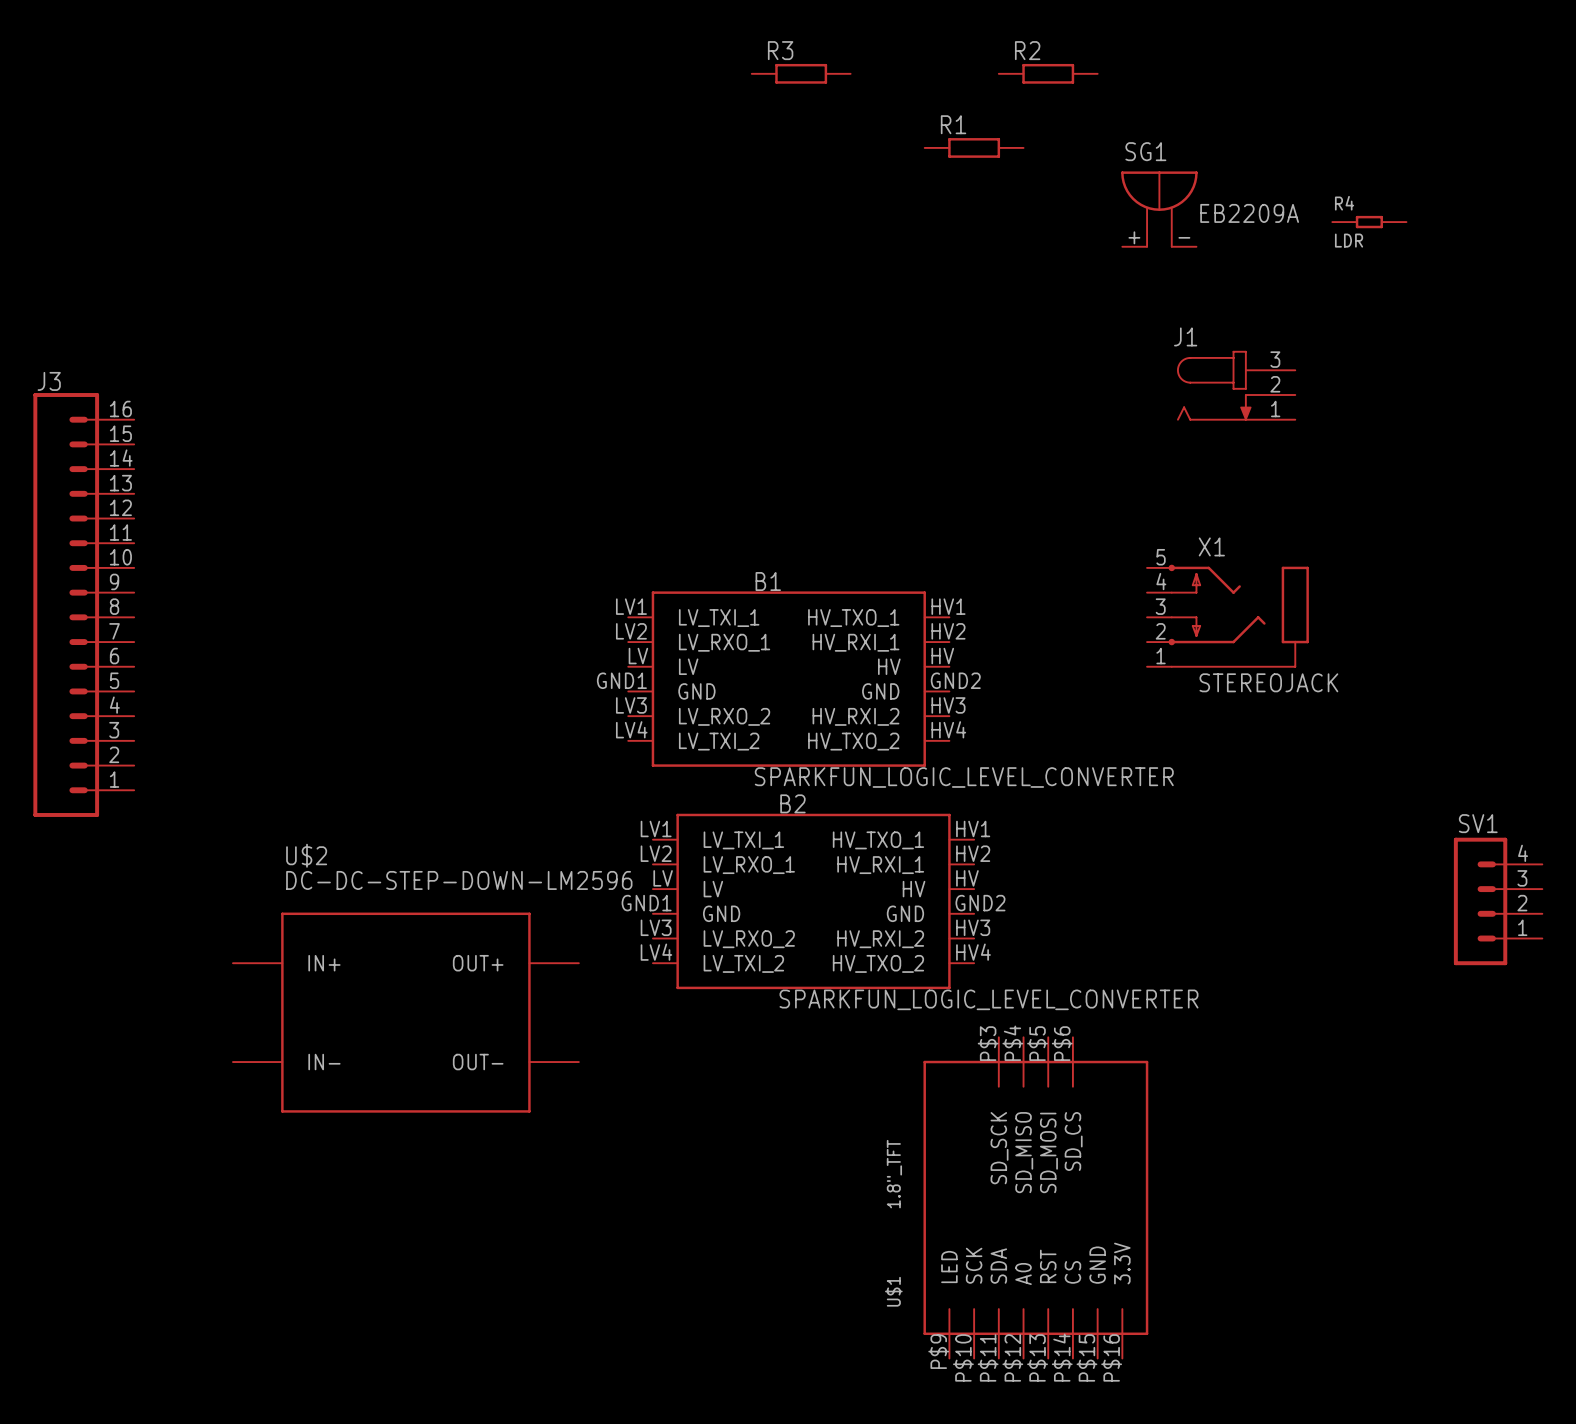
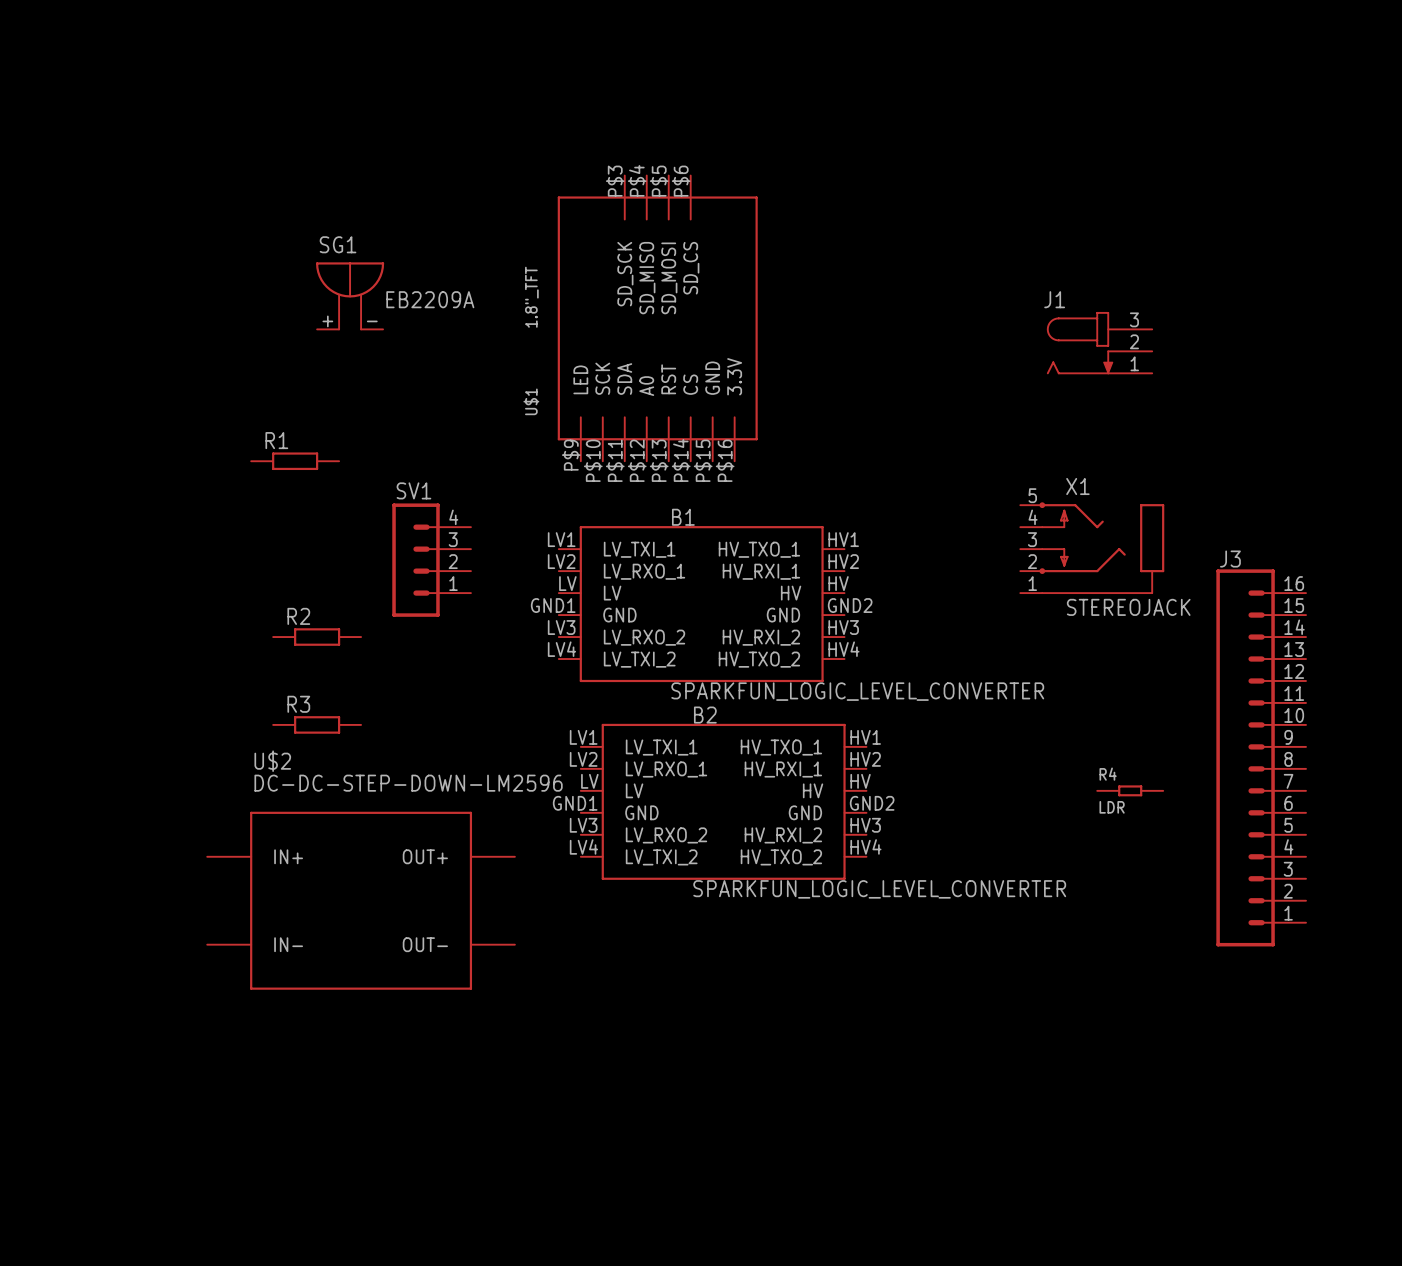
R3 position: (801, 73) -> (317, 724)
R2 position: (1048, 73) -> (317, 637)
R1 position: (974, 147) -> (295, 461)
SG1 position: (1159, 209) -> (350, 296)
R4 position: (1369, 222) -> (1130, 790)
J3 position: (83, 604) -> (1261, 757)
SV1 position: (1498, 901) -> (431, 560)
U$1 position: (1035, 1197) -> (657, 318)

